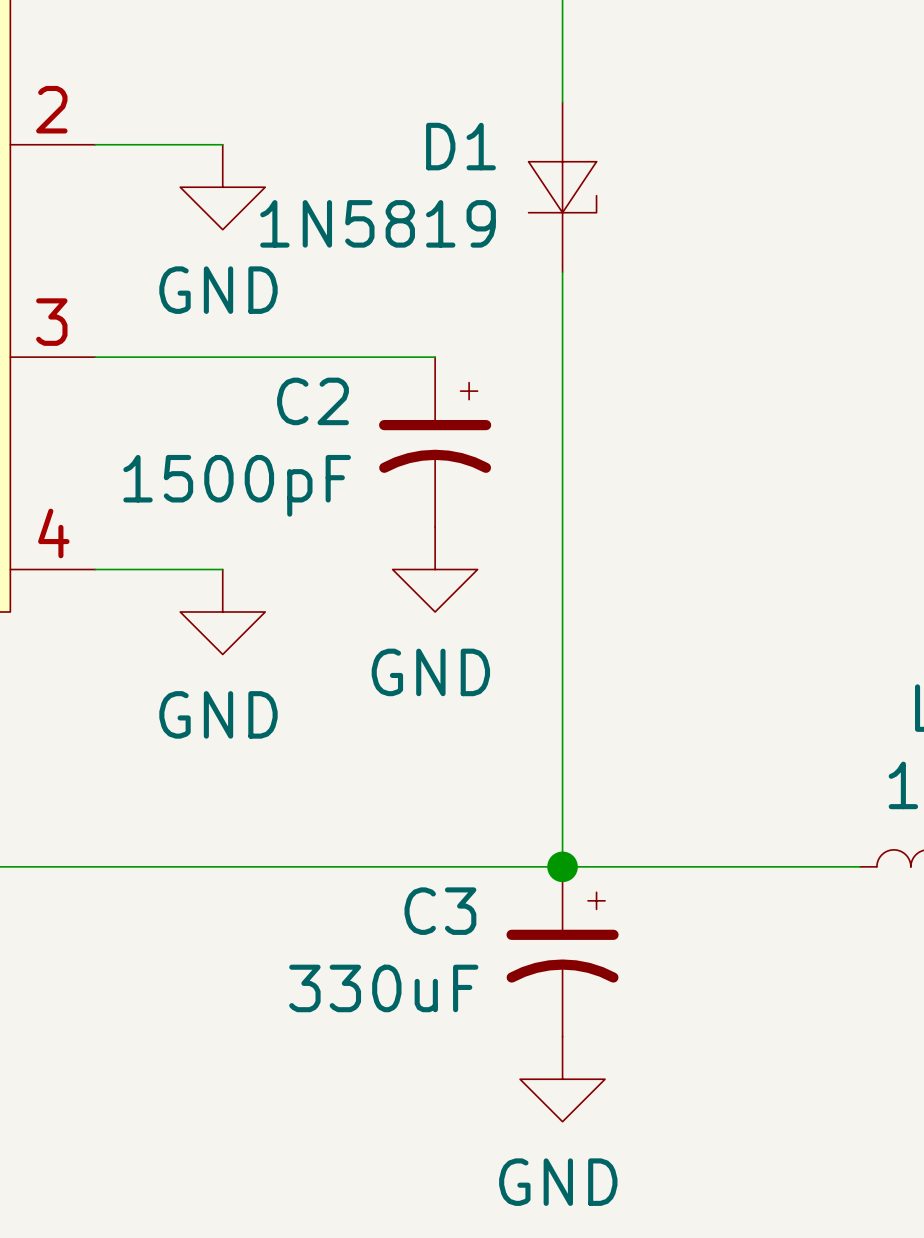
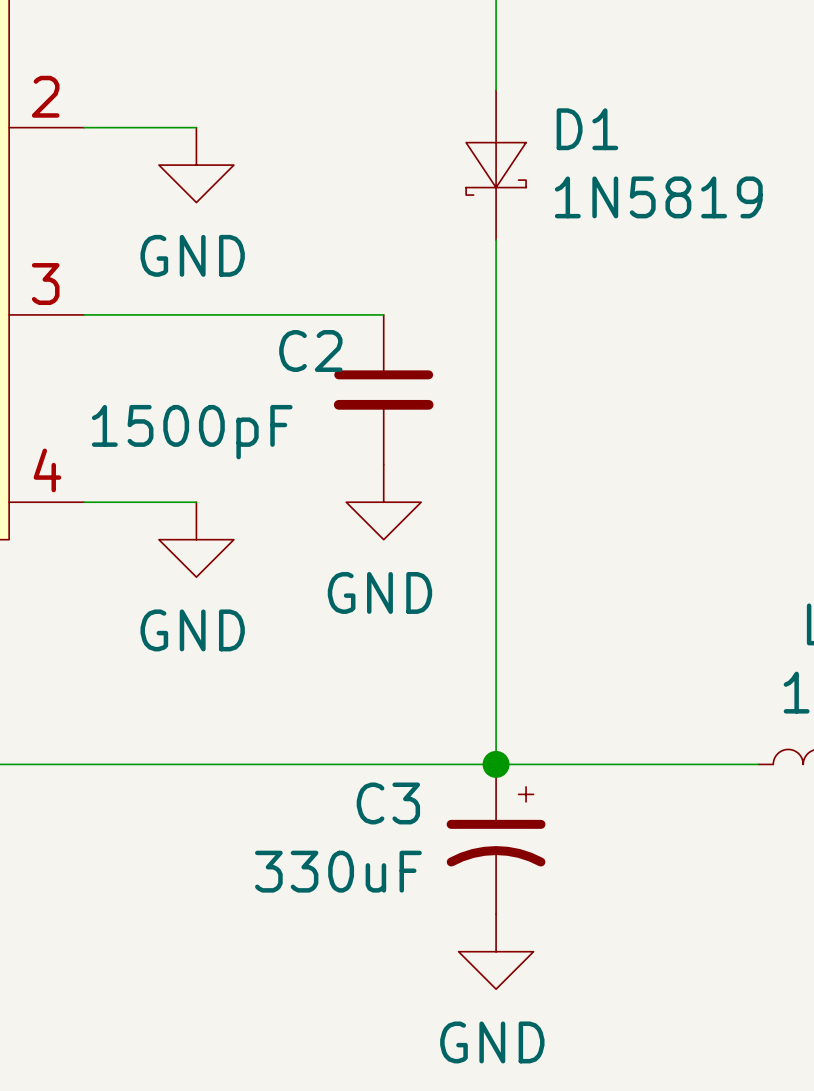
D1 symbol: [528, 102, 597, 273] -> [466, 90, 527, 241]
D1 name position: D1 (460, 146) -> D1 (587, 129)
D1 value position: 1N5819 (378, 223) -> 1N5819 (658, 197)
C2 symbol: [379, 357, 492, 528] -> [333, 314, 434, 465]

